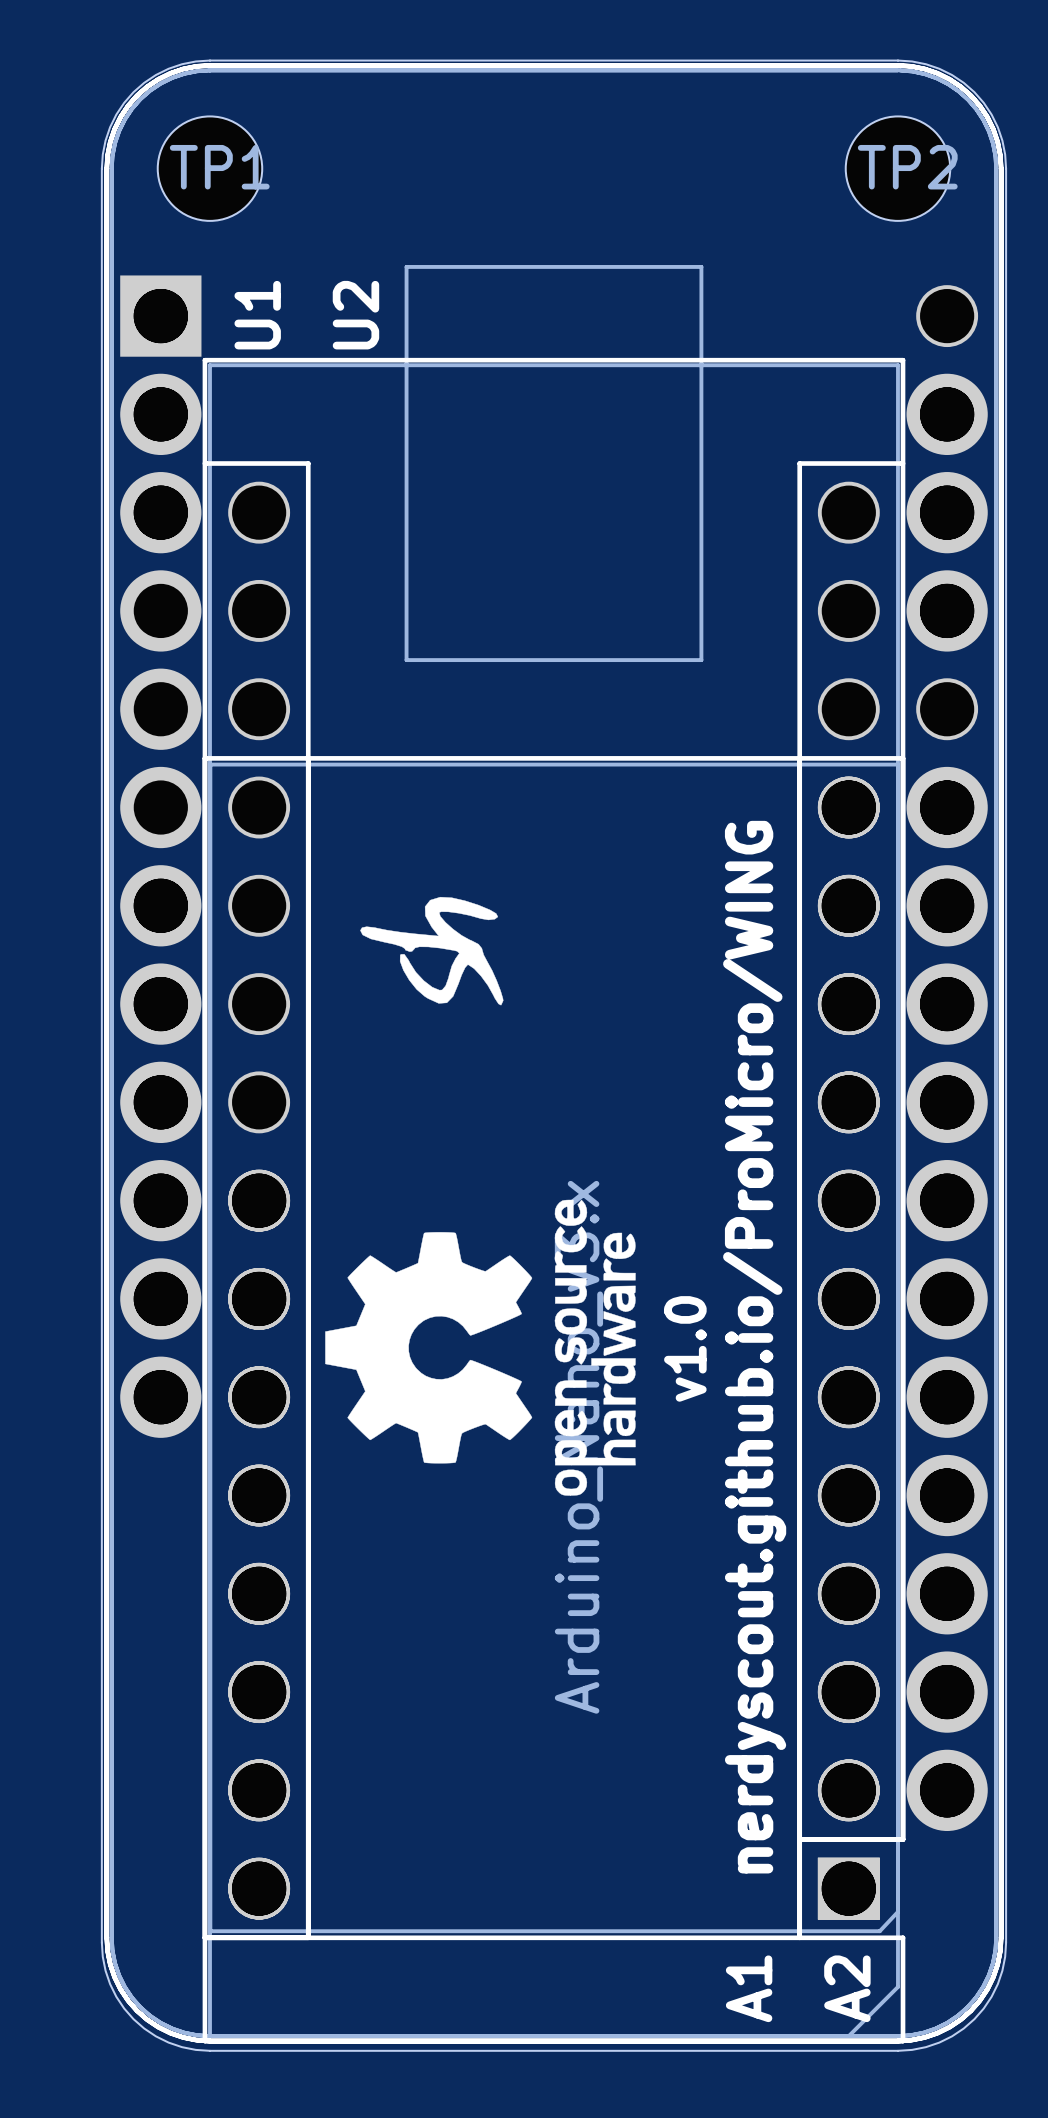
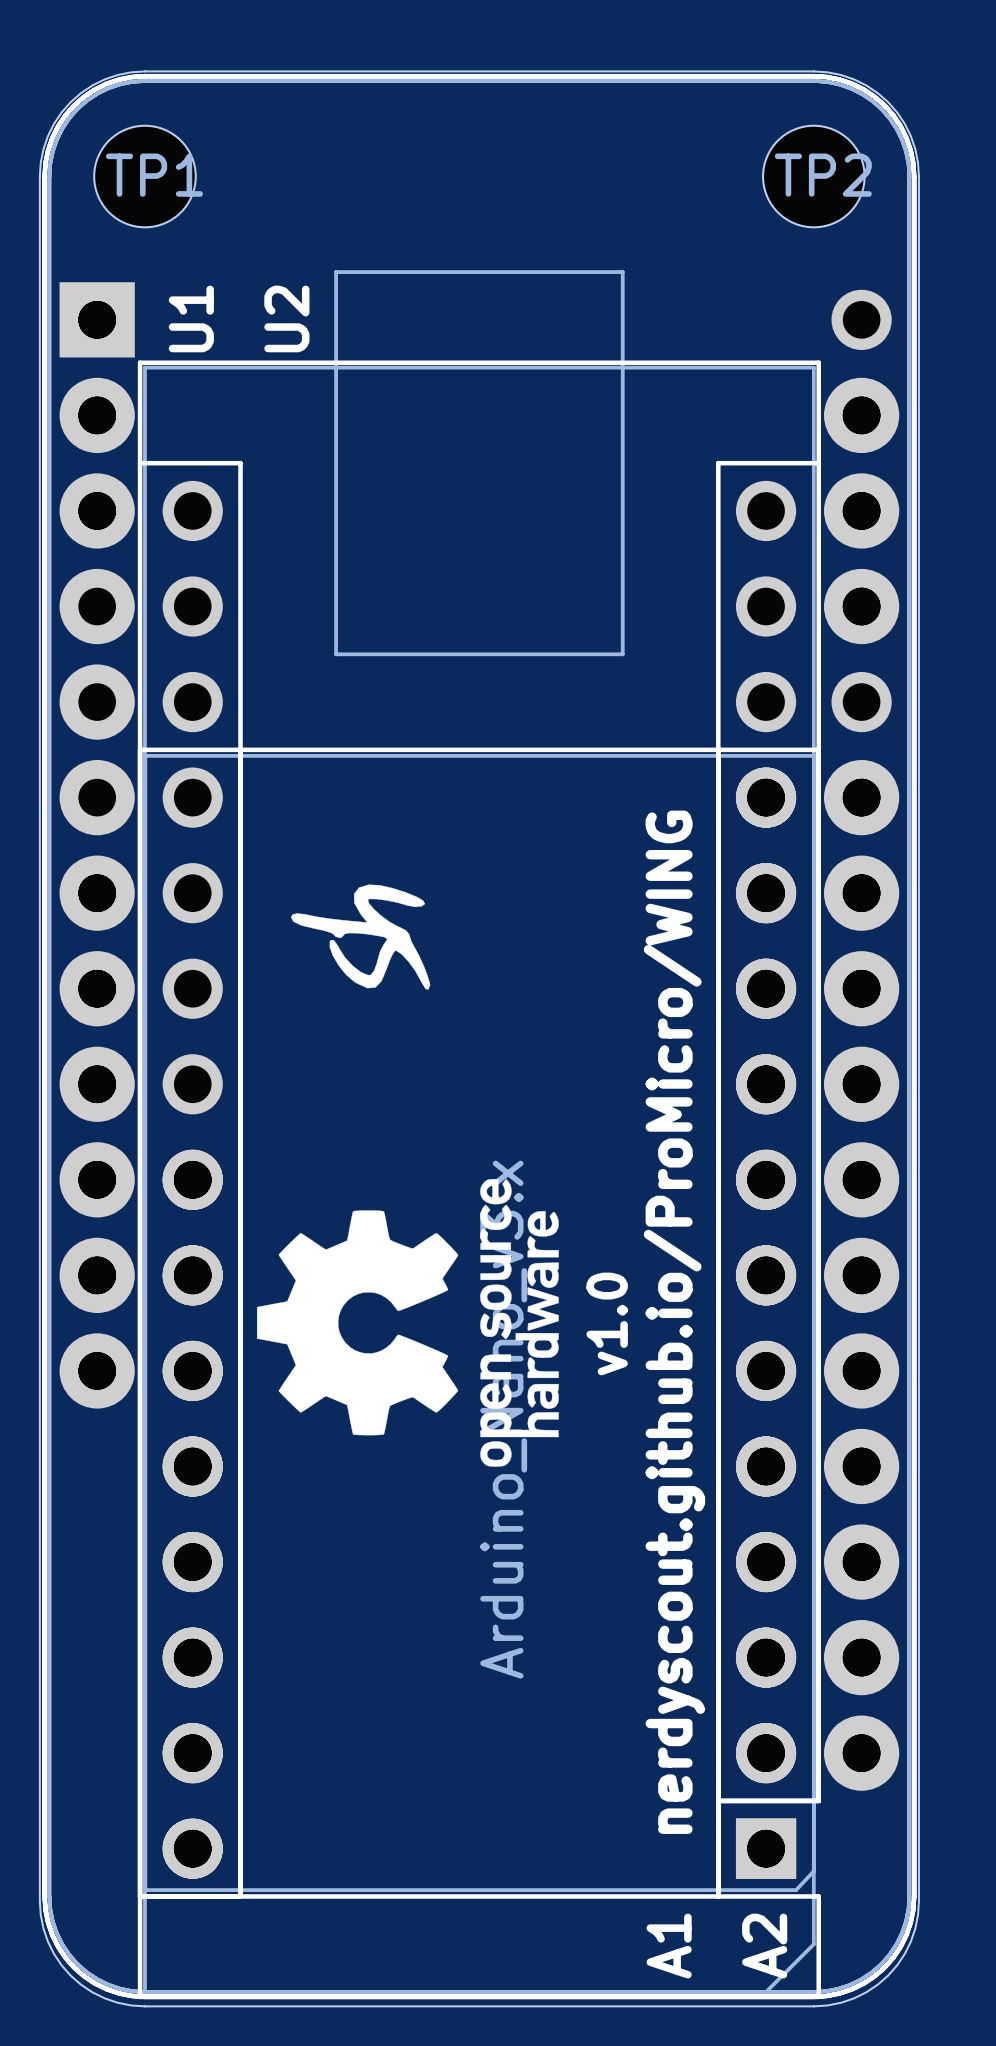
U1 footprint: [104, 63, 1004, 2044] -> [42, 73, 917, 2000]
U2 footprint: [104, 63, 1004, 2044] -> [42, 73, 917, 2000]
A2 footprint: [202, 265, 906, 2044] -> [137, 270, 821, 2000]
A1 footprint: [202, 756, 906, 1941] -> [137, 747, 821, 1899]

